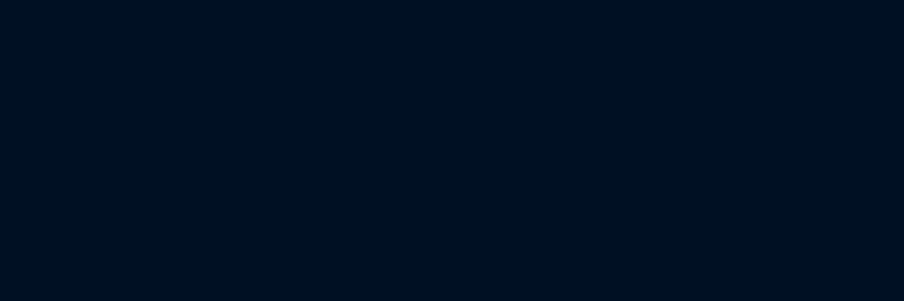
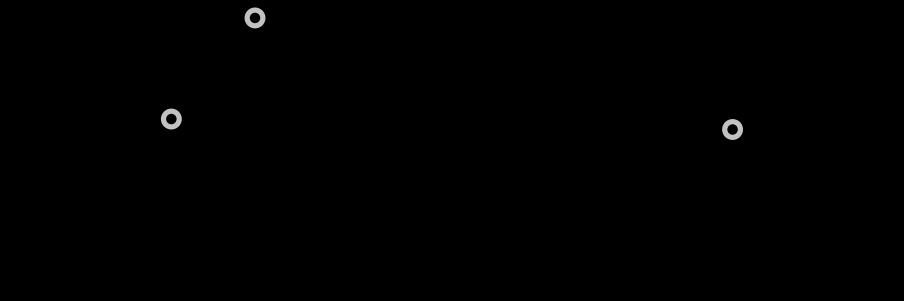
via: none -> (255, 17)
via: none -> (171, 119)
via: none -> (732, 129)

